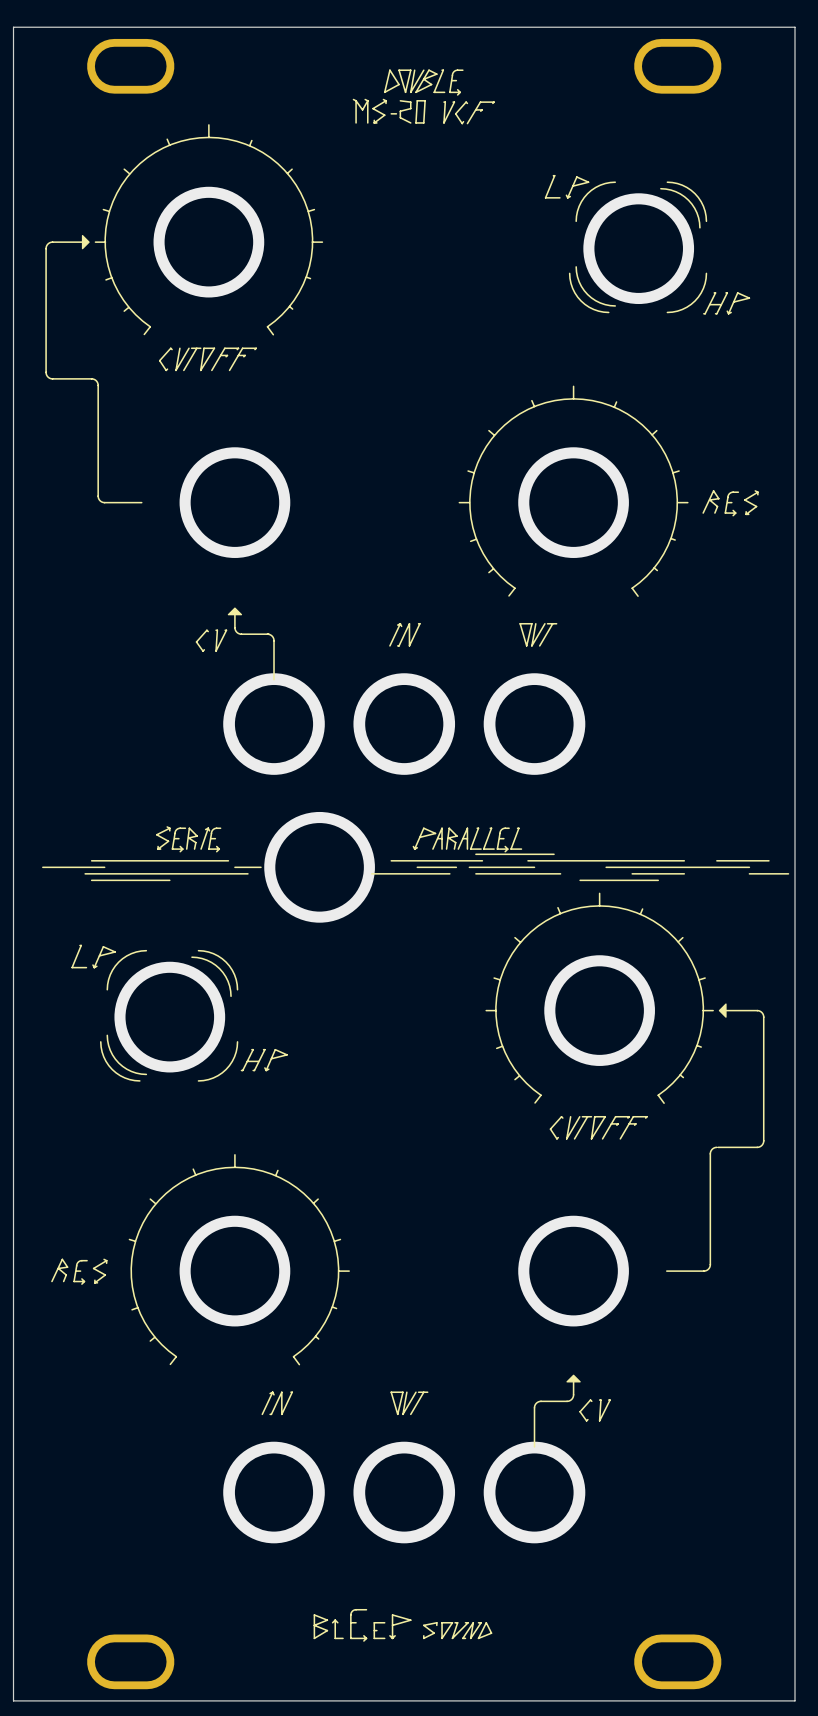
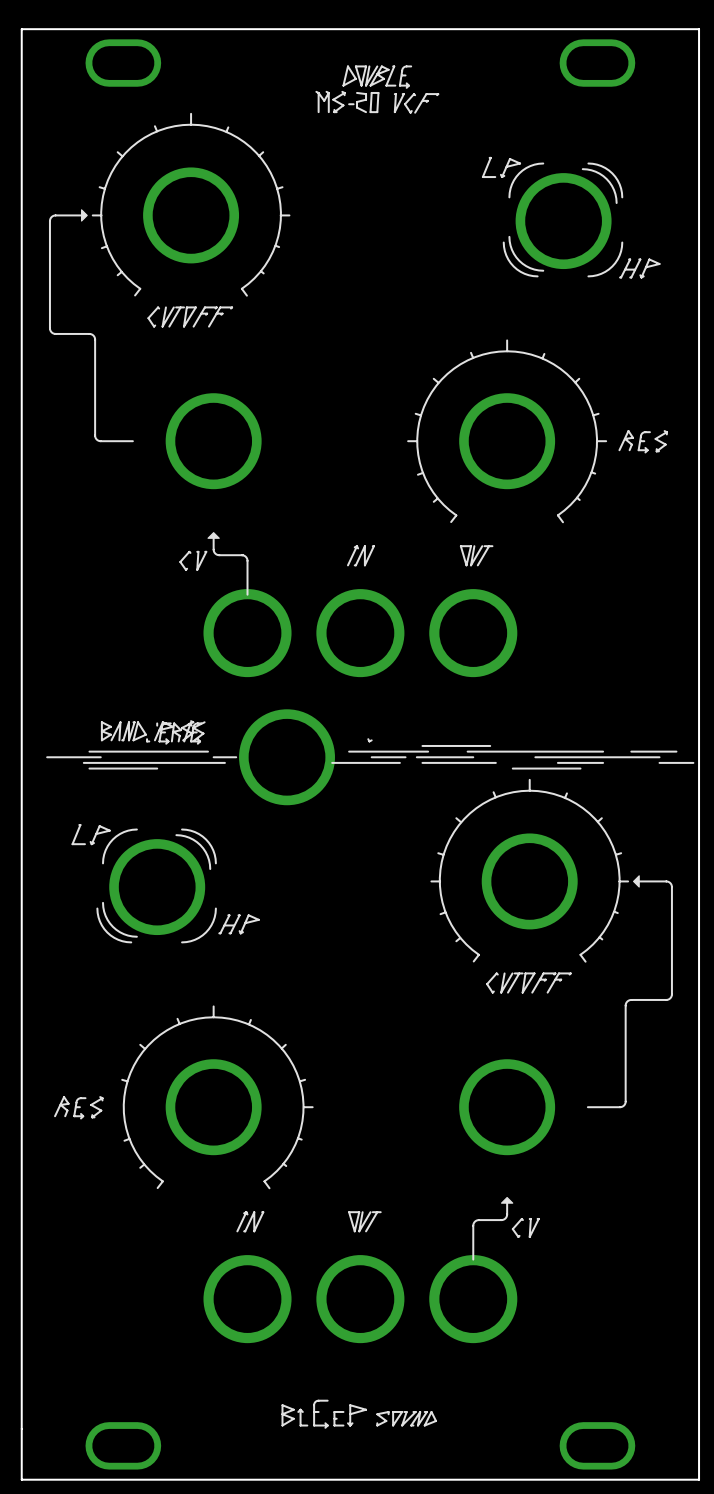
line: none -> (101, 722) (110, 726) (101, 731) (110, 734) (101, 740) (101, 722)
line: none -> (133, 722) (128, 740) (128, 722) (122, 740)
line: none -> (138, 722) (145, 734) (133, 740) (138, 722)
line: (167, 826) (169, 828) (156, 834) (168, 841) (158, 849) -> (191, 721) (193, 722) (182, 727) (192, 733) (183, 740)
line: none -> (204, 722) (193, 727) (203, 733) (194, 740)
line: (477, 828) (470, 849) (481, 849) -> none
line: (490, 828) (483, 849) (494, 849) -> none
line: (509, 828) (500, 830) (497, 849) (506, 849) -> none
line: (517, 828) (511, 849) (521, 849) -> none
line: (419, 837) (435, 833) (423, 828) (414, 849) -> (159, 730) (173, 726) (162, 722) (154, 740)
line: (438, 838) (442, 838) -> none
line: (463, 838) (467, 838) -> none
line: (499, 838) (503, 838) -> none
line: (505, 846) (507, 849) (505, 851) -> none
line: none -> (111, 740) (120, 722) (119, 740)
line: (432, 849) (442, 828) (442, 849) -> none
line: (446, 849) (449, 828) (457, 836) (448, 838) (455, 842) (454, 849) -> none
line: (458, 849) (467, 828) (467, 849) -> none

